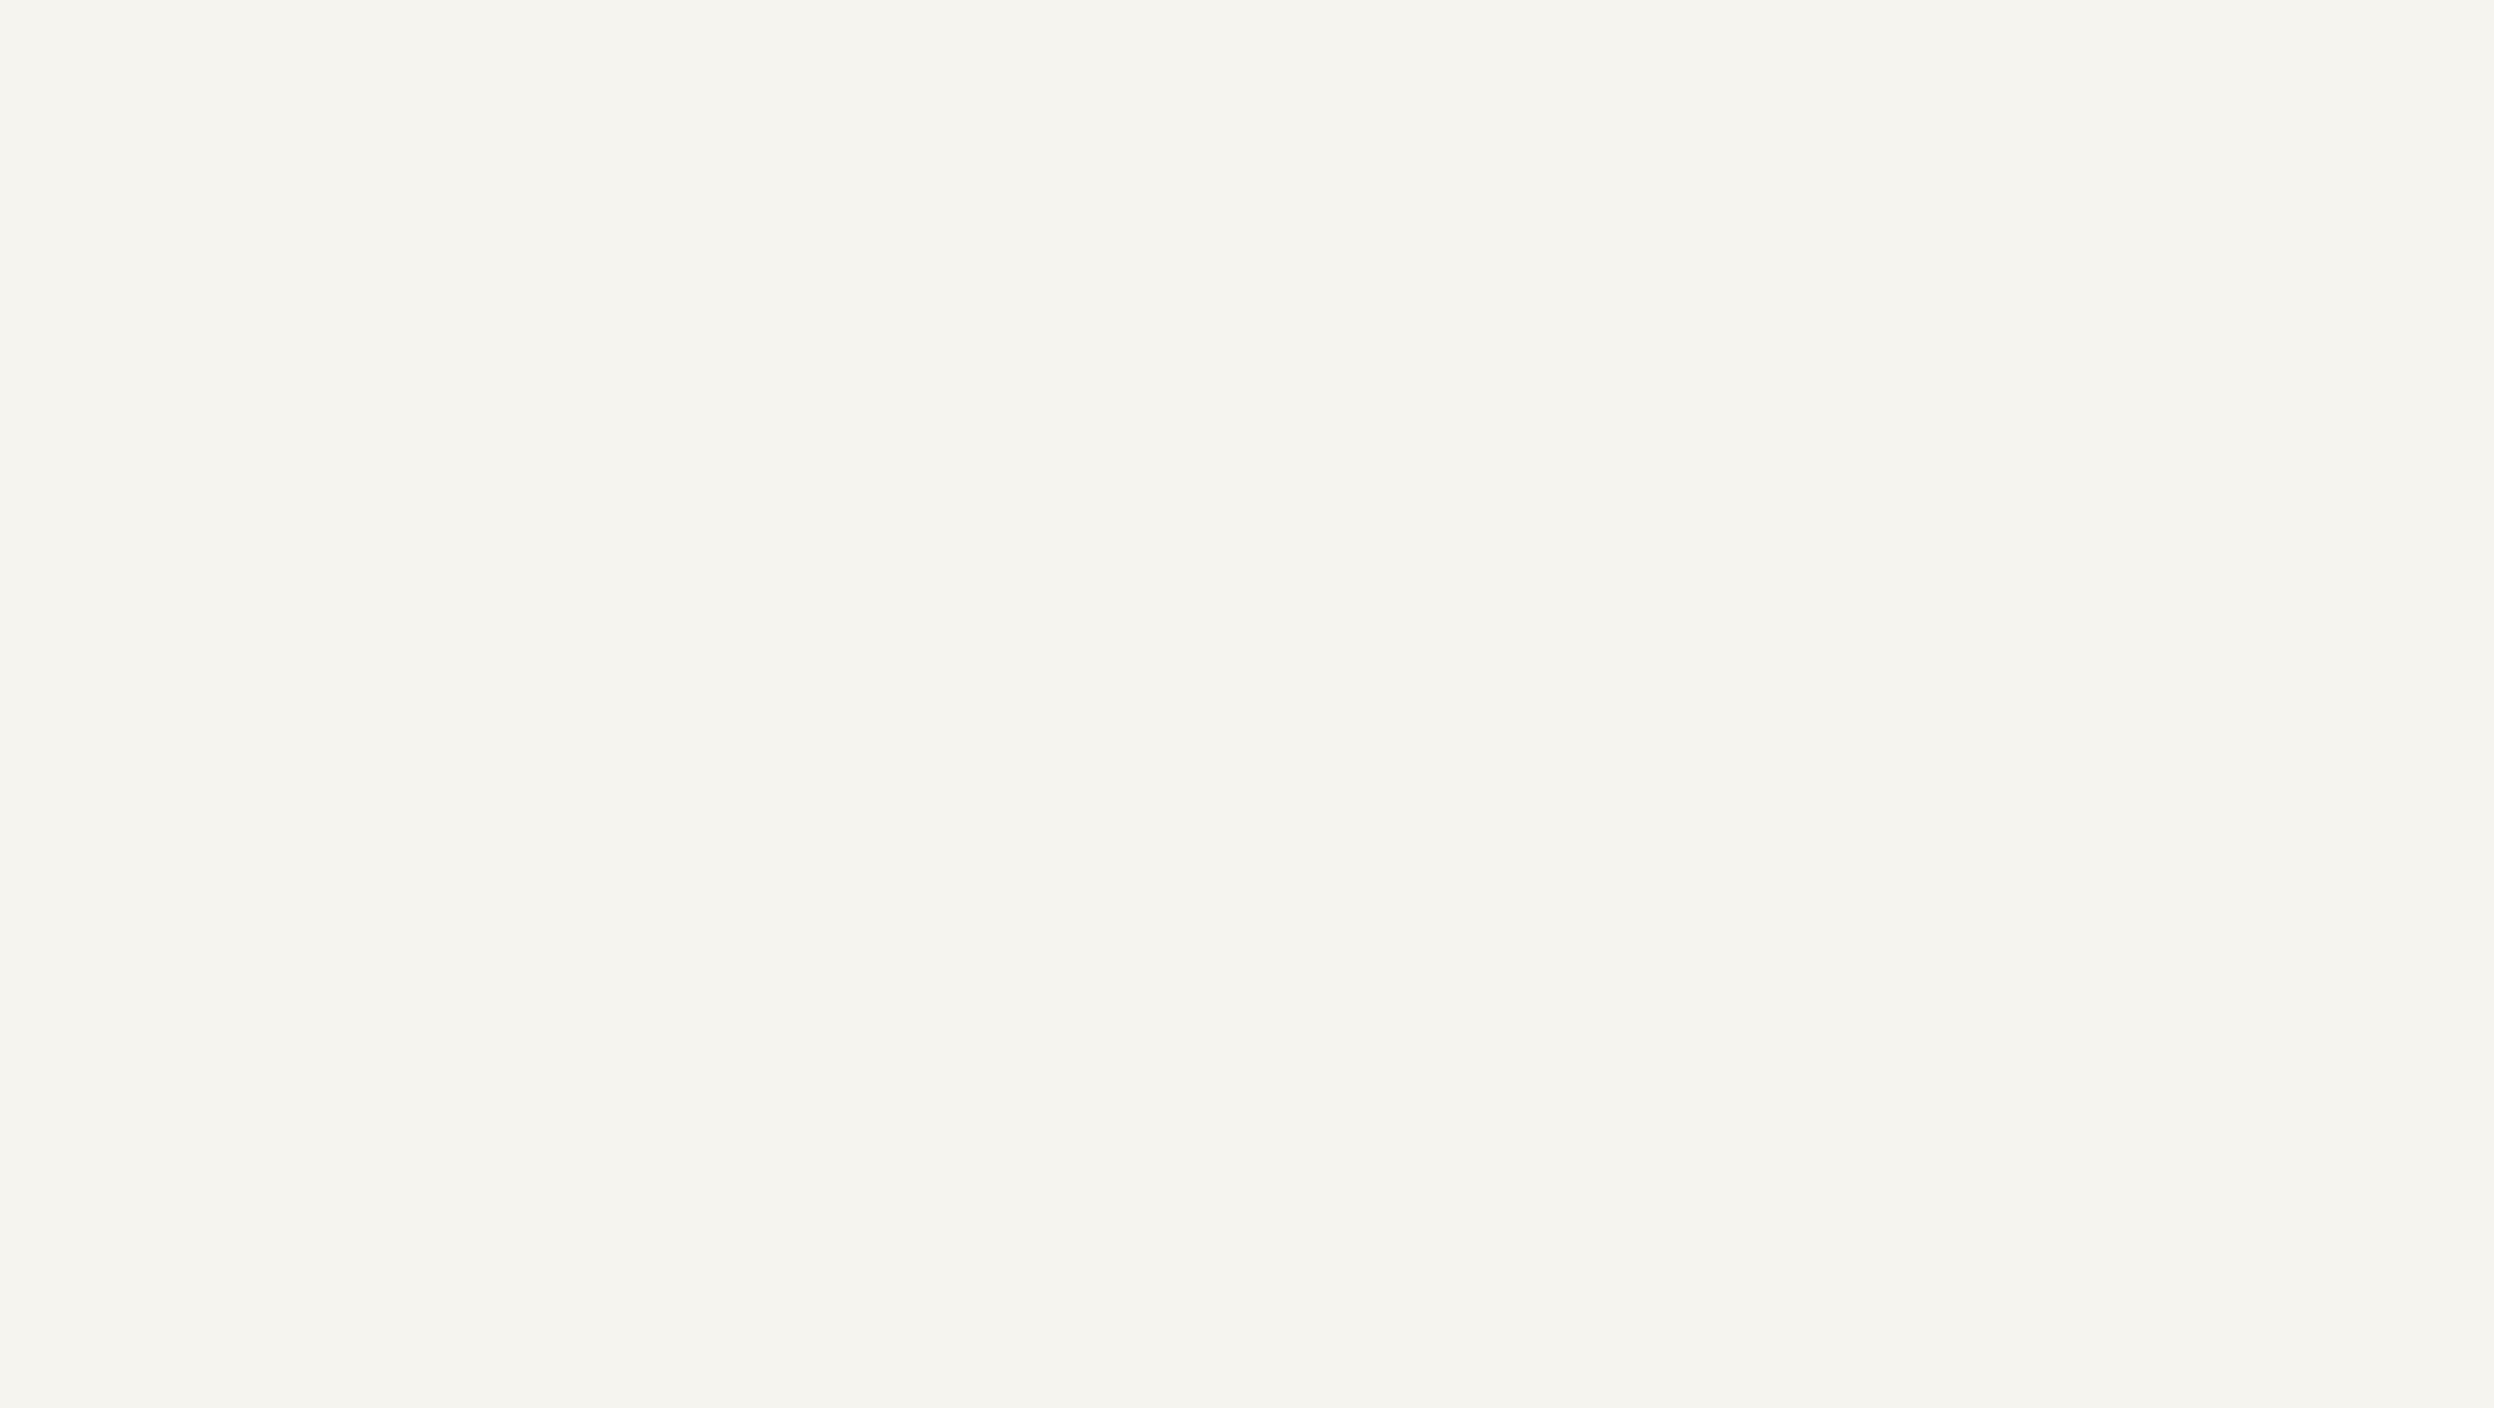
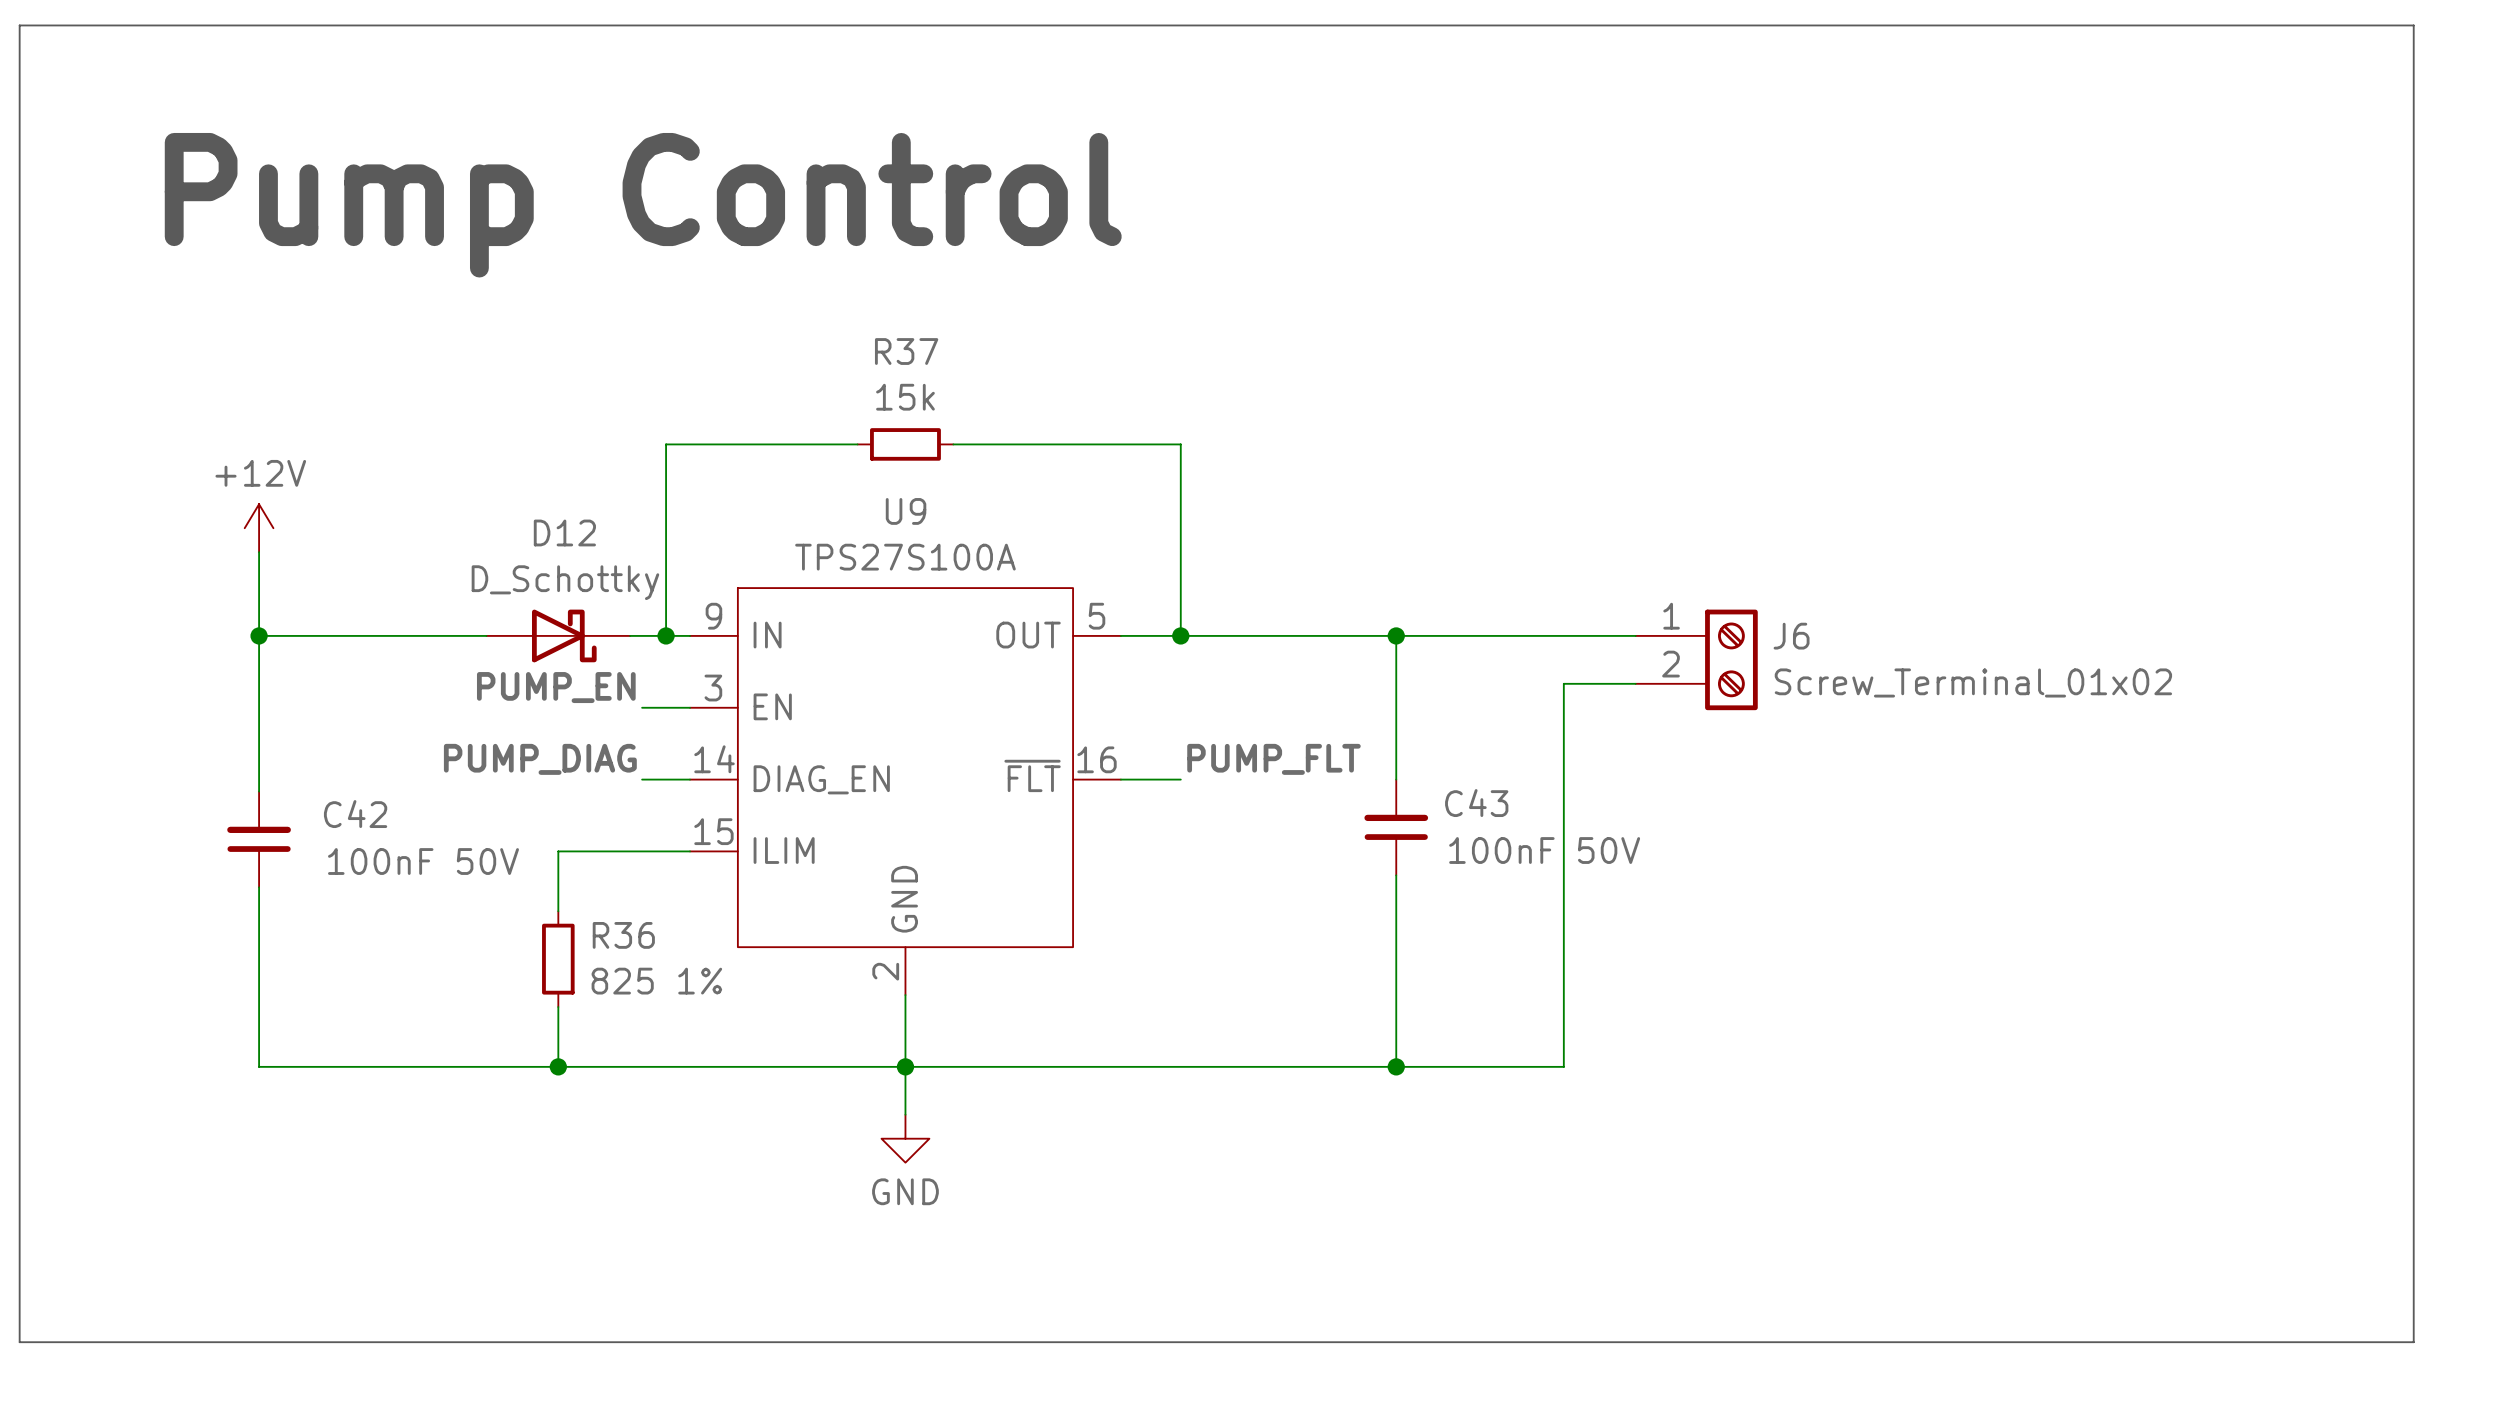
line: none -> (19, 25) (2413, 25) (2413, 1342) (19, 1342) (19, 25)
text: none -> Pump Control (643, 205)
wire: none -> (857, 444) (666, 444) (666, 635)
R37: none -> 15k (905, 444)
wire: none -> (953, 444) (1180, 444) (1180, 635)
power symbol: none -> +12V (259, 528)
wire: none -> (259, 552) (259, 791)
wire: none -> (259, 635) (486, 635)
junction: none -> (259, 635)
D12: none -> D_Schottky (558, 635)
wire: none -> (630, 635) (690, 635)
junction: none -> (666, 635)
wire: none -> (1120, 635) (1635, 635)
junction: none -> (1180, 635)
wire: none -> (1396, 635) (1396, 779)
junction: none -> (1396, 635)
J6: none -> Screw_Terminal_01x02 (1696, 659)
wire: none -> (1635, 683) (1563, 683) (1563, 1066) (259, 1066) (259, 887)
label: none -> PUMP_EN (556, 687)
wire: none -> (642, 707) (690, 707)
label: none -> PUMP_DIAG (540, 759)
label: none -> PUMP_FLT (1274, 759)
wire: none -> (642, 779) (690, 779)
wire: none -> (1120, 779) (1180, 779)
U9: none -> TPS27S100A (905, 791)
C43: none -> 100nF 50V (1396, 827)
C42: none -> 100nF 50V (259, 839)
wire: none -> (690, 851) (558, 851) (558, 911)
wire: none -> (1396, 875) (1396, 1066)
R36: none -> 825 1% (558, 959)
wire: none -> (905, 995) (905, 1114)
wire: none -> (558, 1007) (558, 1066)
junction: none -> (558, 1066)
junction: none -> (905, 1066)
junction: none -> (1396, 1066)
power symbol: none -> GND (905, 1138)

